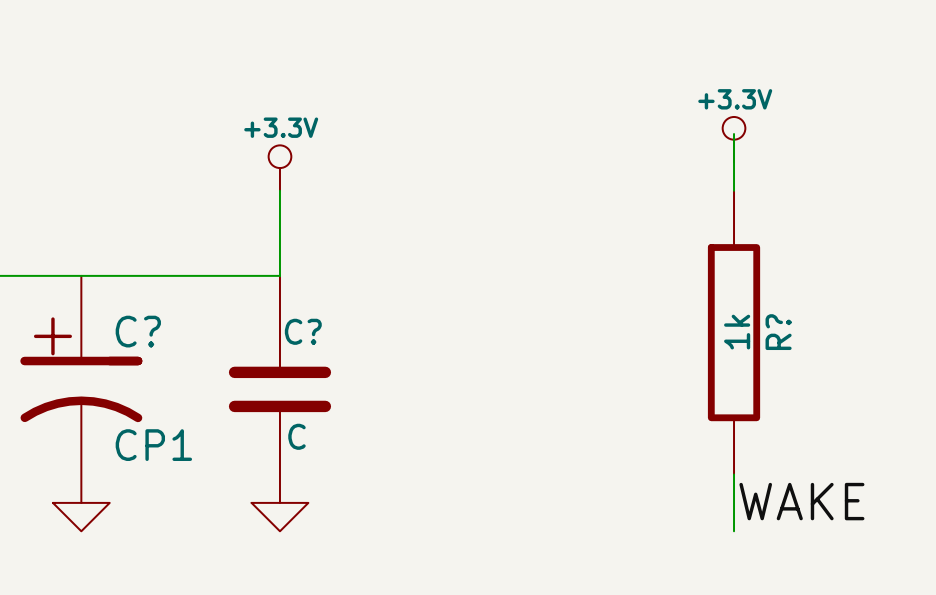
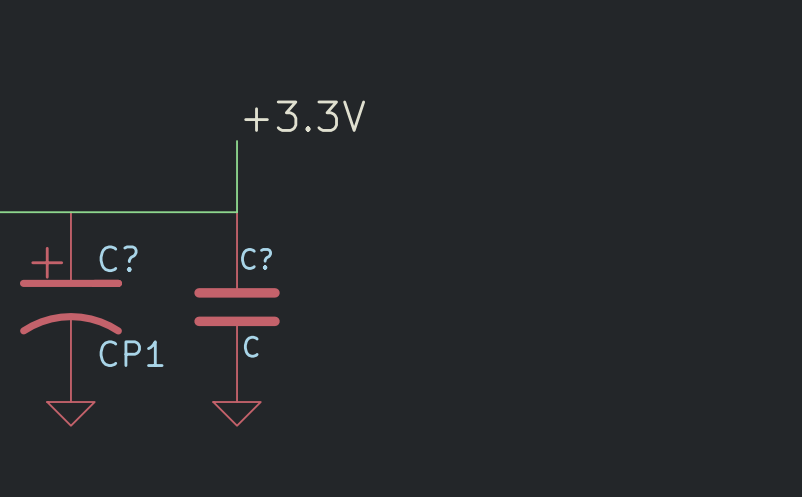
wire: (734, 134) (734, 190) -> none
power symbol: +3.3V (734, 139) -> none
label: none -> +3.3V (304, 116)
power symbol: +3.3V (279, 168) -> none
R?: 1k (734, 332) -> none
wire: (734, 474) (734, 531) -> none
label: WAKE (801, 501) -> none

